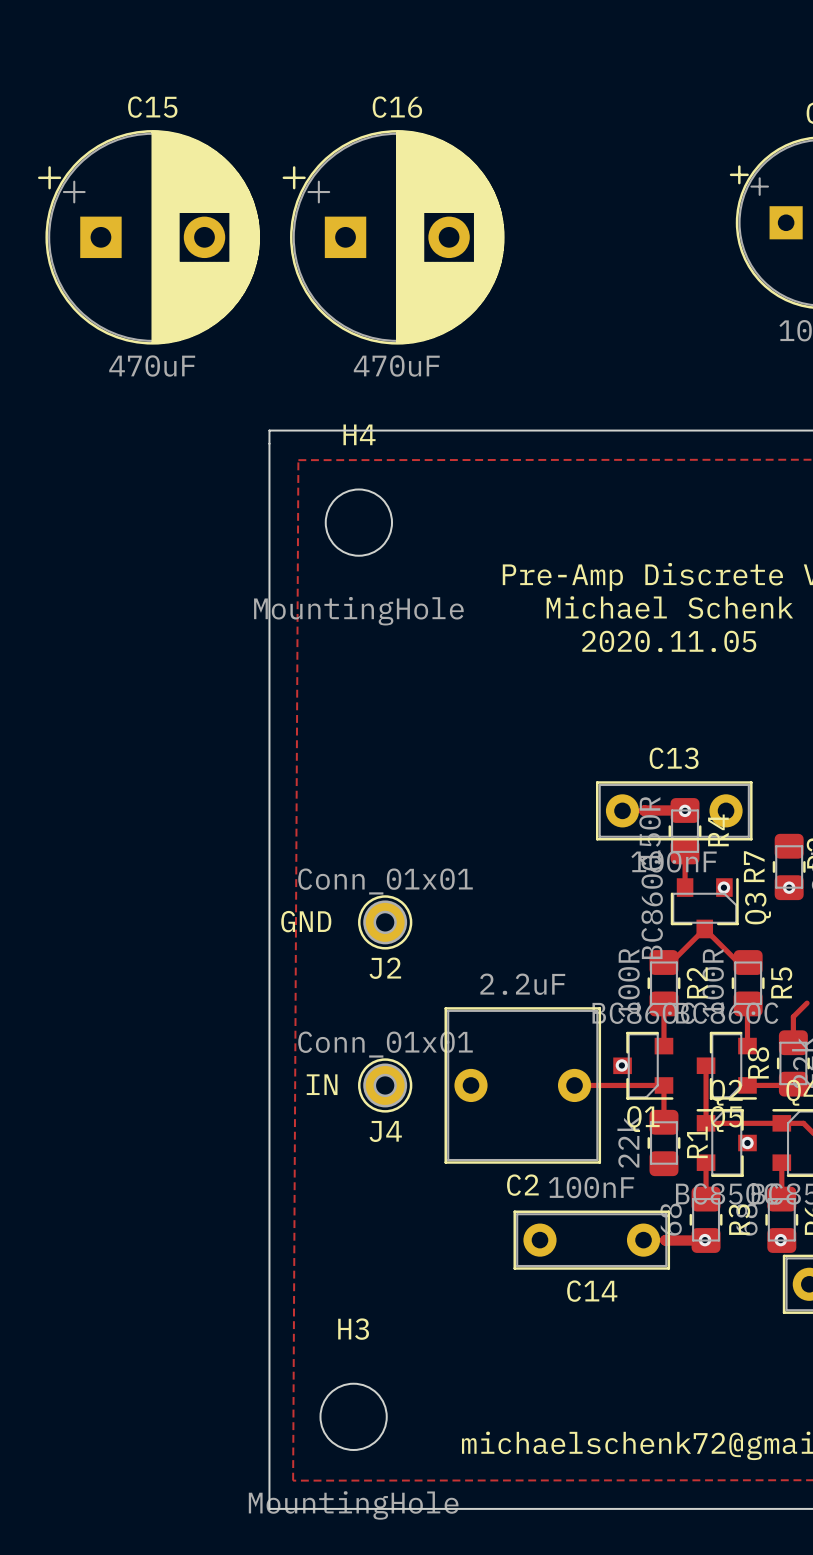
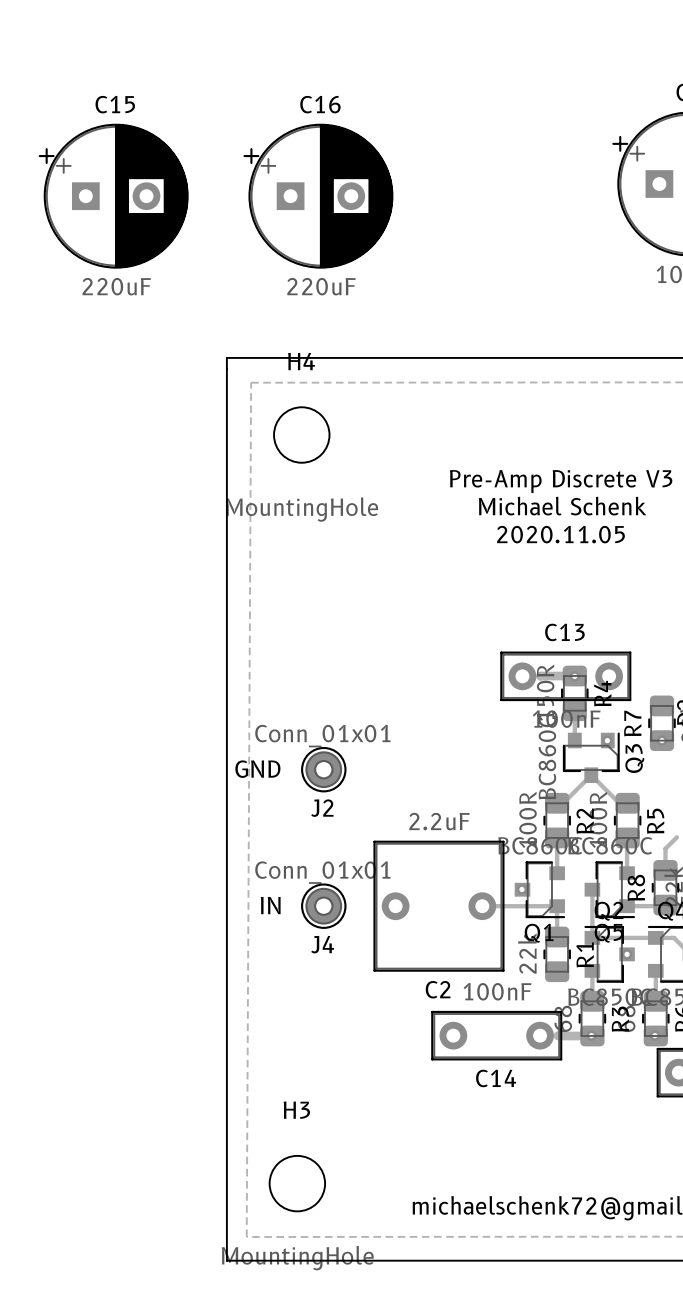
C15 footprint: [38, 130, 261, 345] -> [38, 123, 189, 269]
C16 footprint: [282, 130, 505, 345] -> [243, 123, 394, 269]
C15 value: 470uF (152, 365) -> 220uF (116, 286)
C16 value: 470uF (396, 365) -> 220uF (321, 286)

